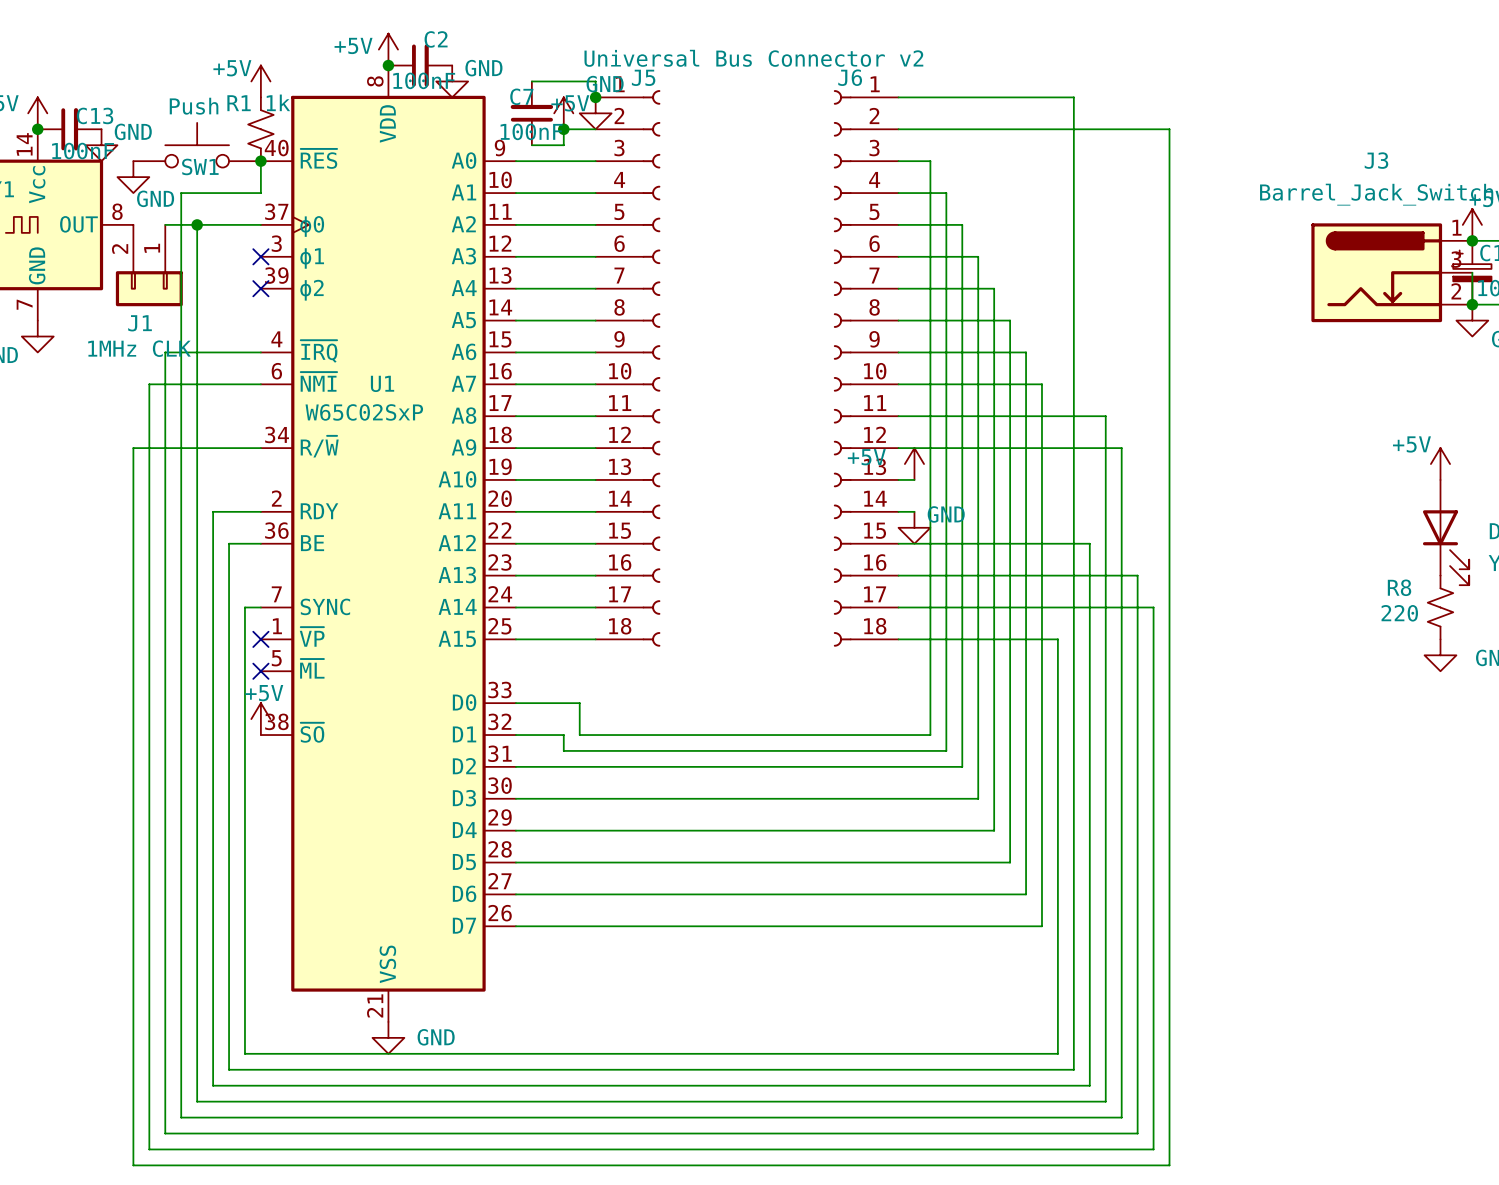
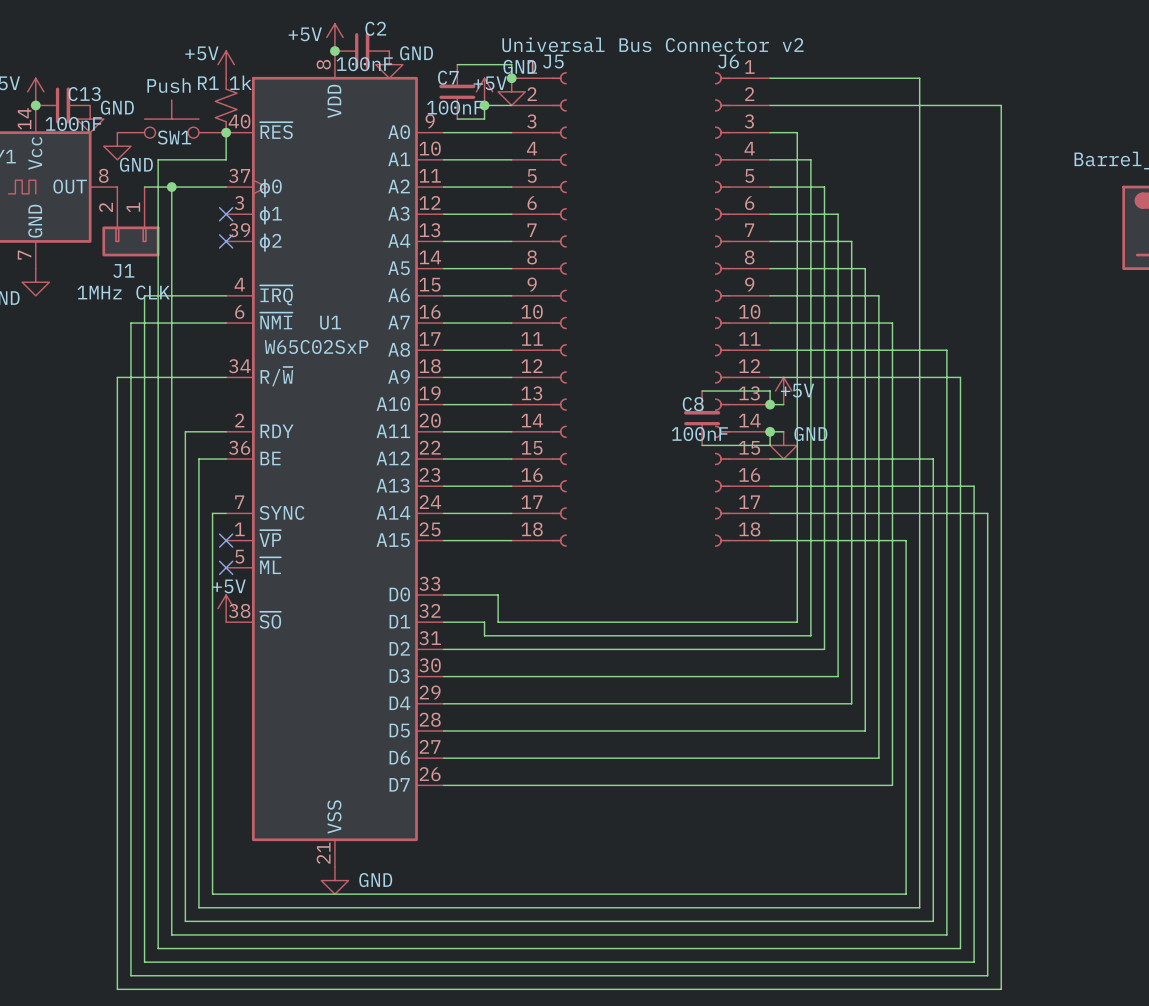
power symbol text position: +5V (866, 457) -> +5V (797, 390)
wire: none -> (702, 391) (770, 391) (770, 404)
junction: none -> (770, 404)
C8: none -> 100nF (702, 418)
wire: none -> (770, 431) (770, 445) (702, 445)
junction: none -> (770, 431)

